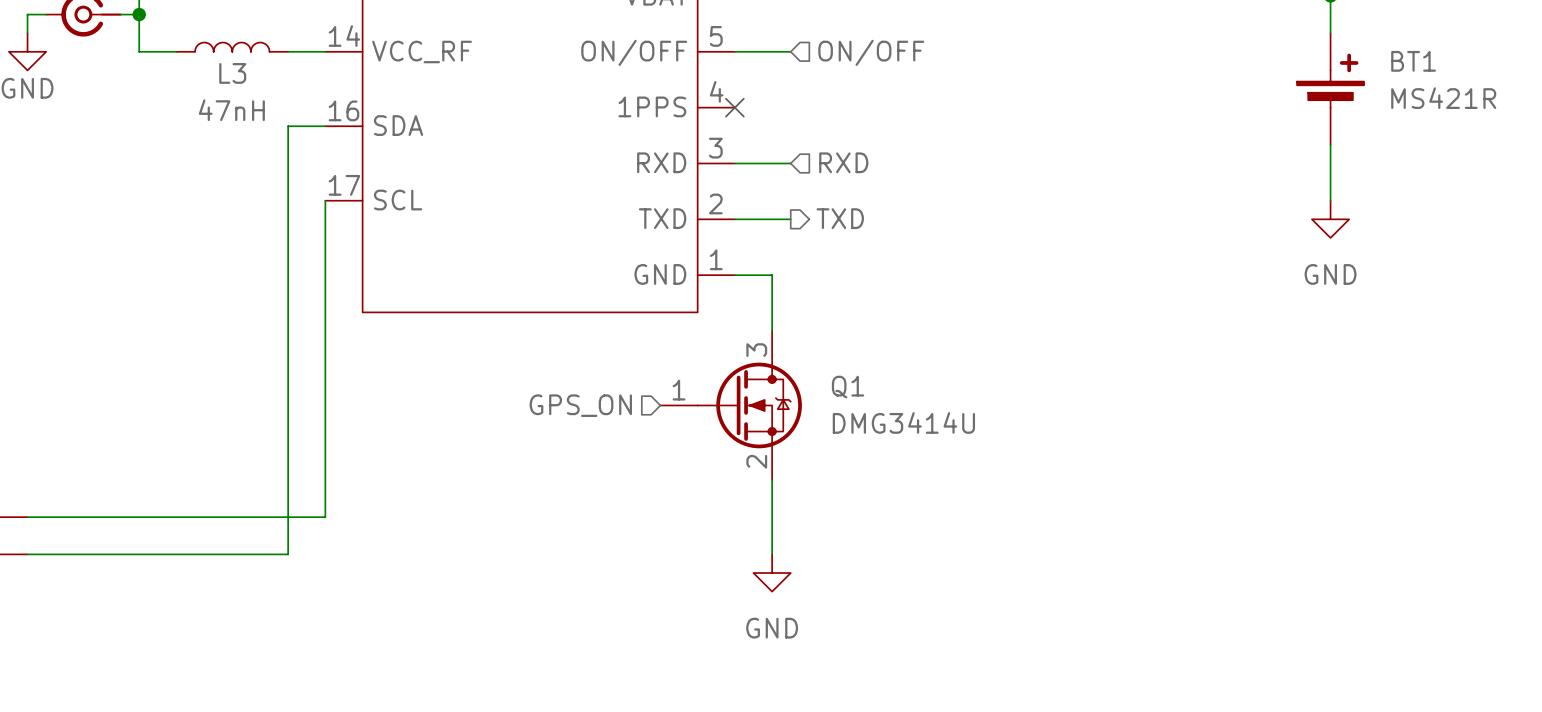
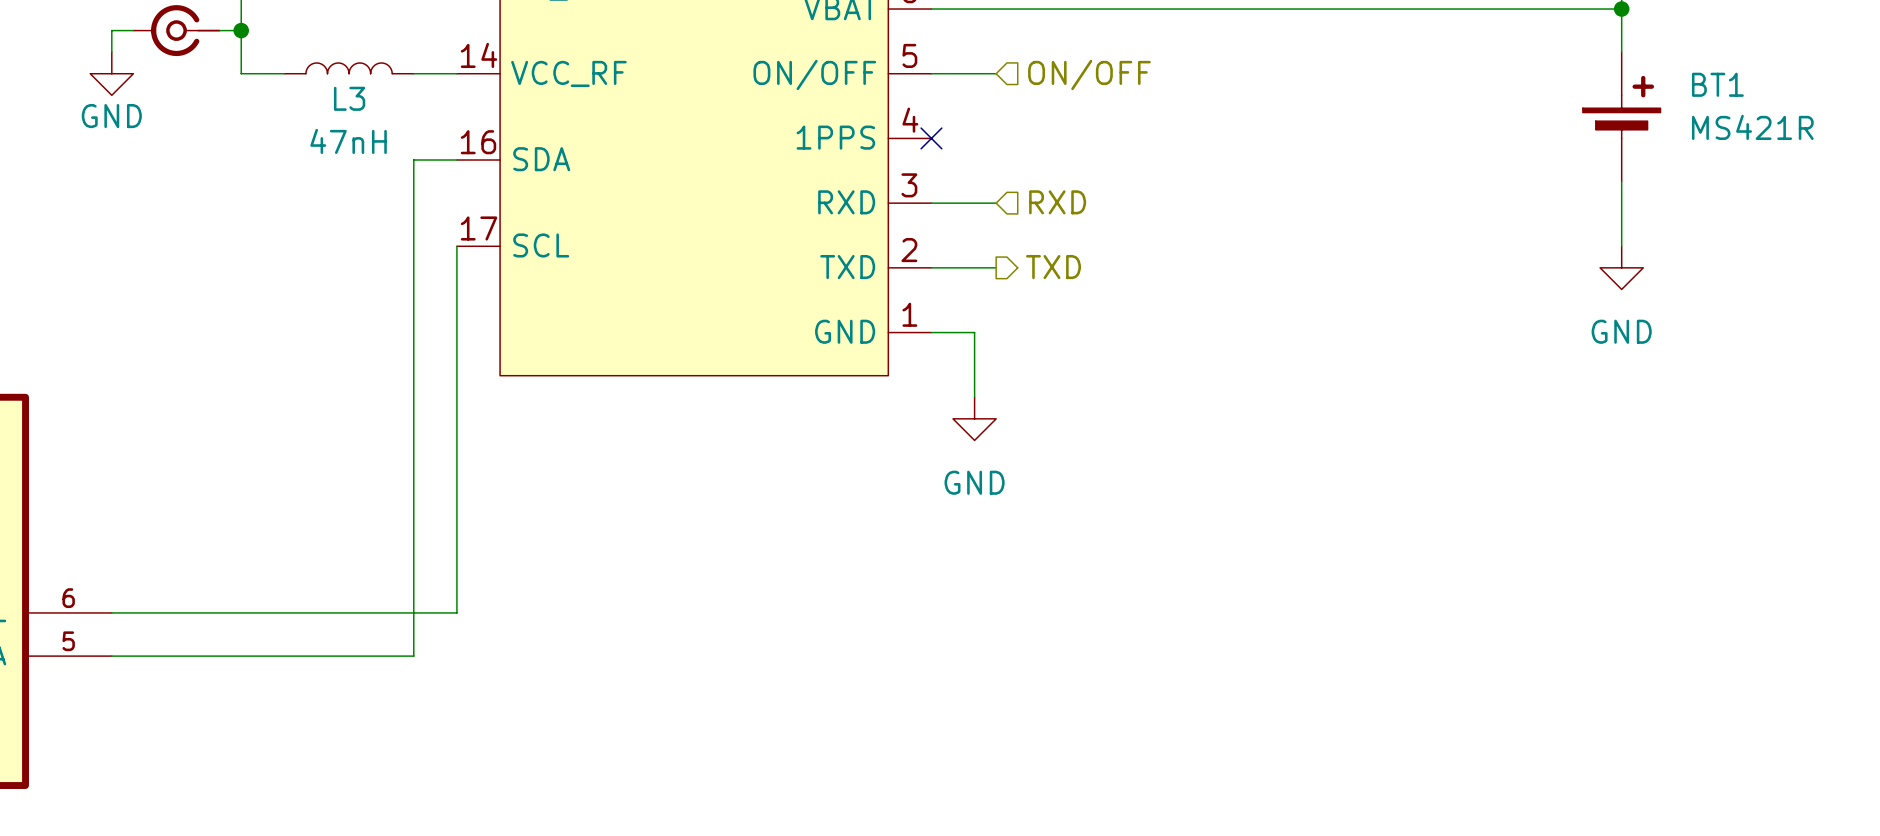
hierarchical label: GPS_ON (580, 405) -> none
Q1: DMG3414U (731, 405) -> none
wire: (772, 479) (772, 554) -> none
power symbol position: GND (772, 573) -> GND (974, 418)

